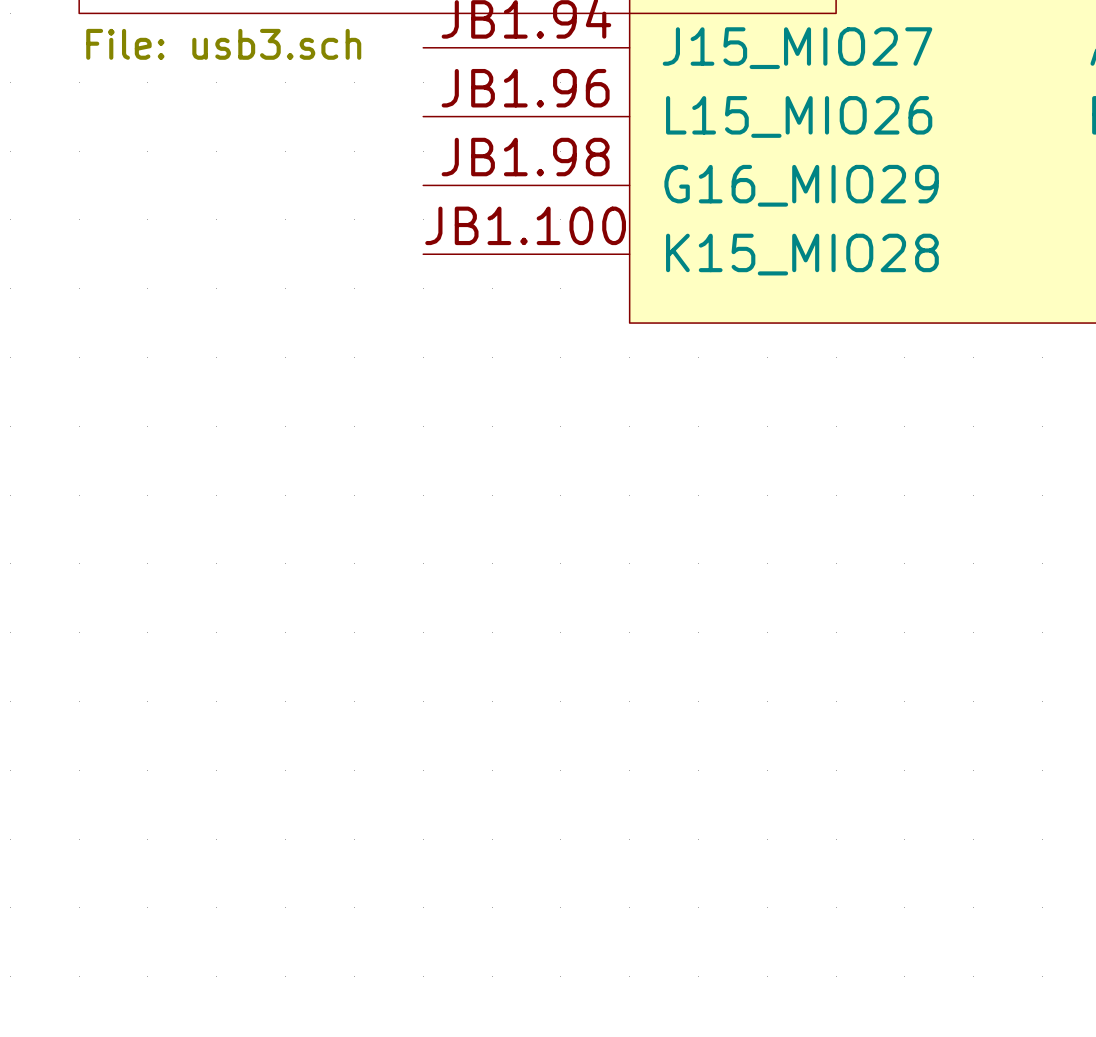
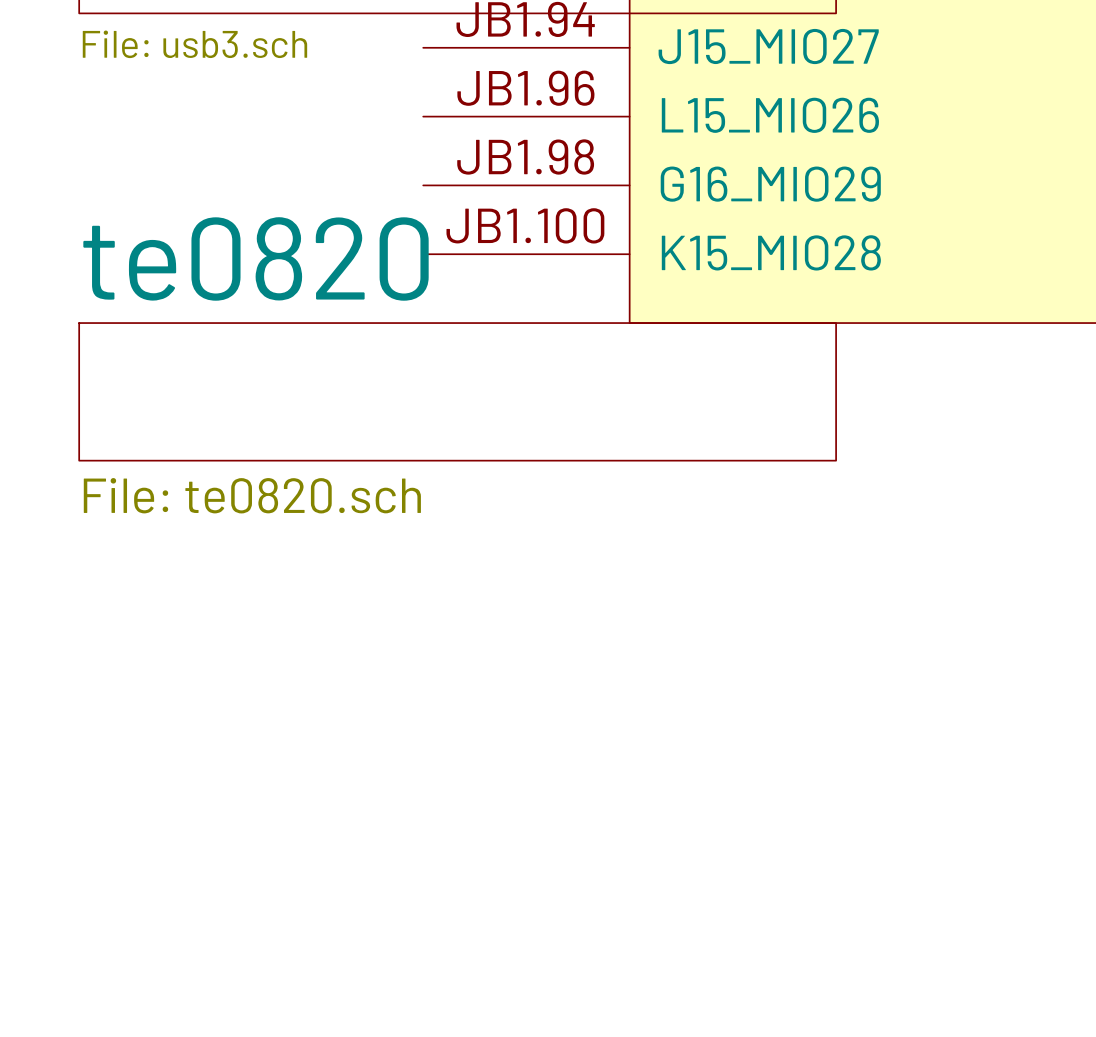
sheet te0820: none -> File: te0820.sch (457, 391)

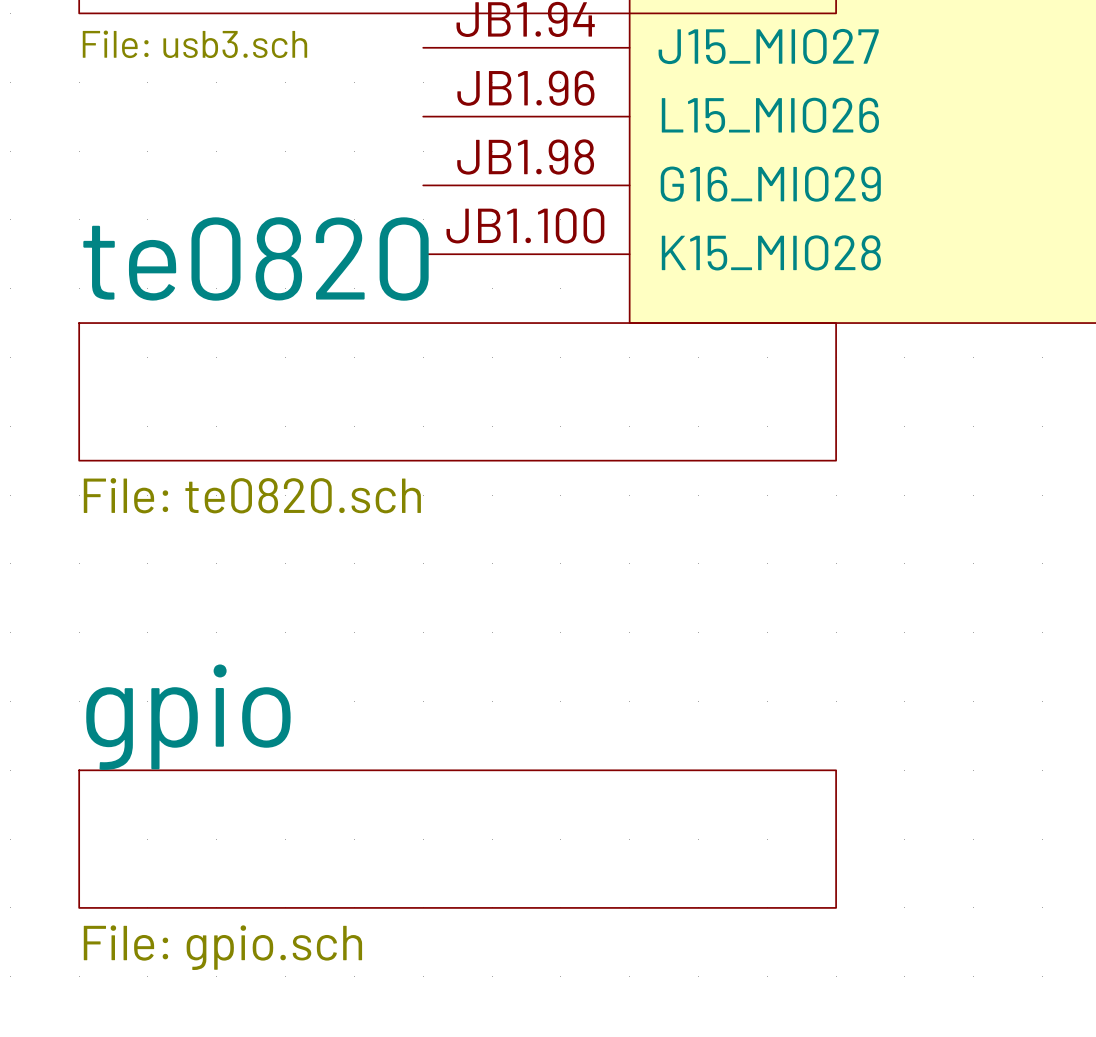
sheet gpio: none -> File: gpio.sch (457, 839)

